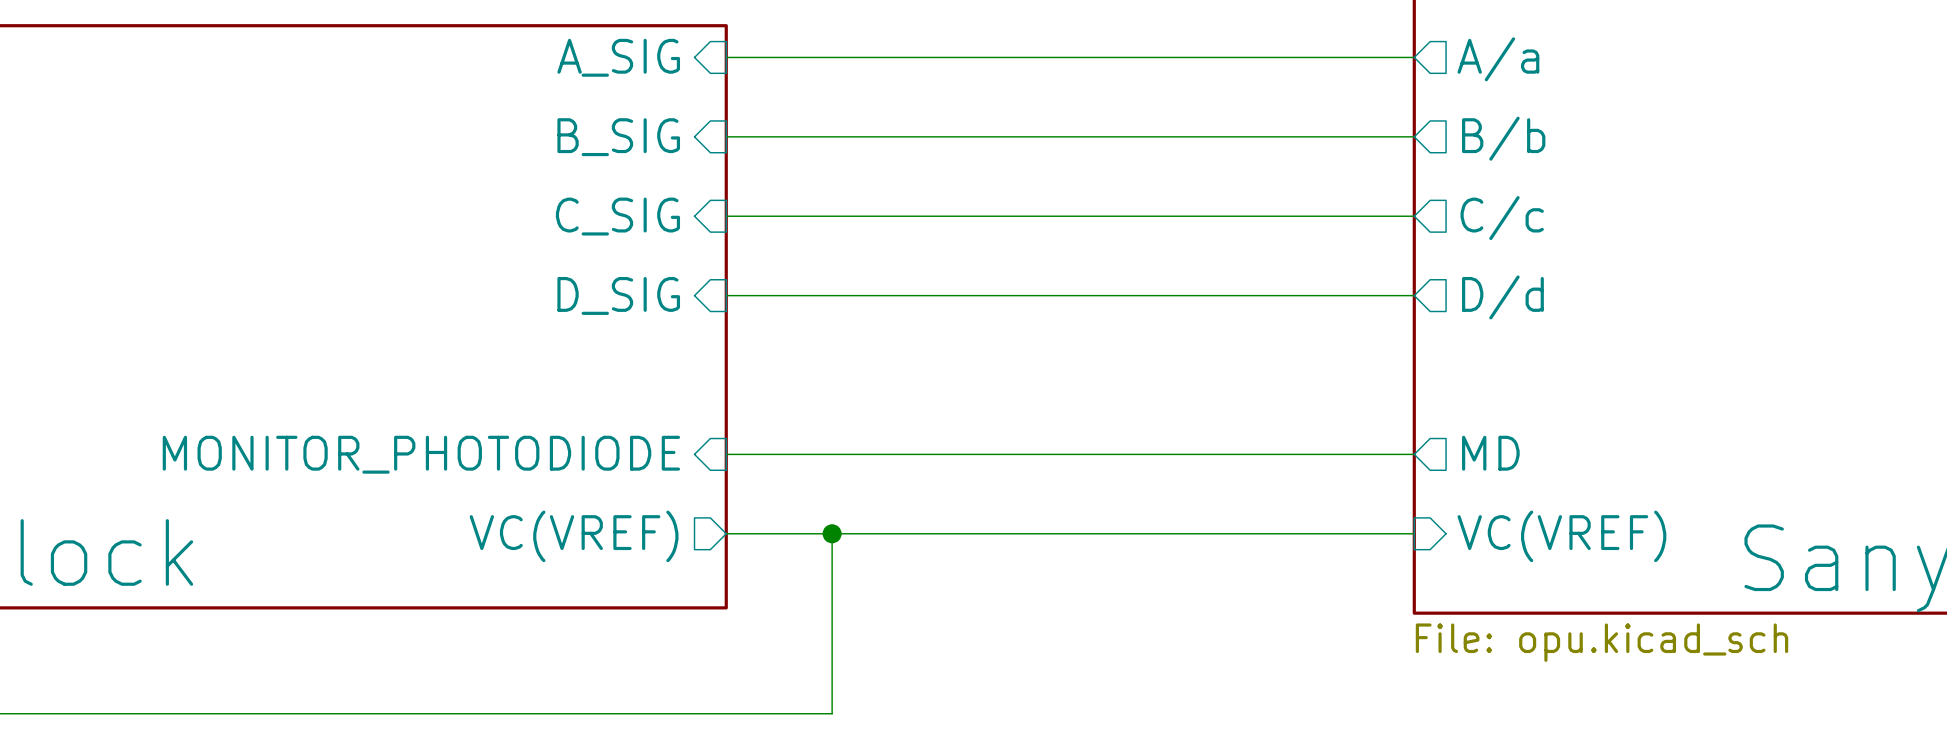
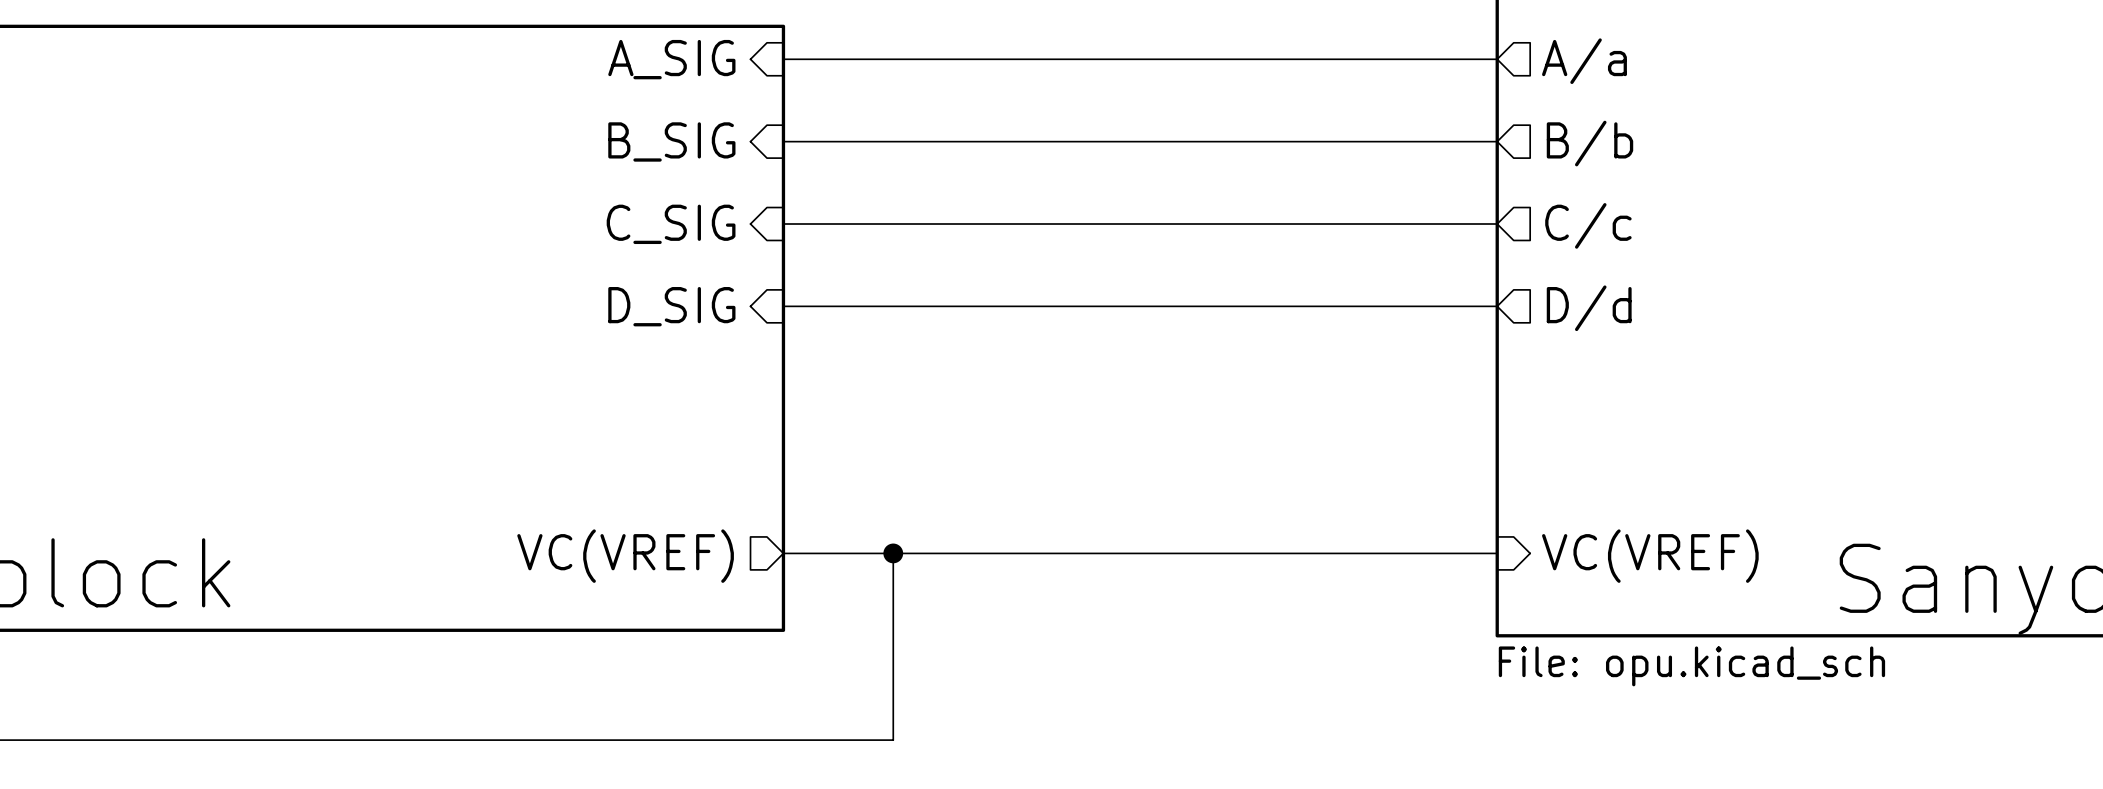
sheet pin: MD (1490, 453) -> none
sheet pin: MONITOR_PHOTODIODE (421, 454) -> none
wire: (726, 454) (1414, 454) -> none

